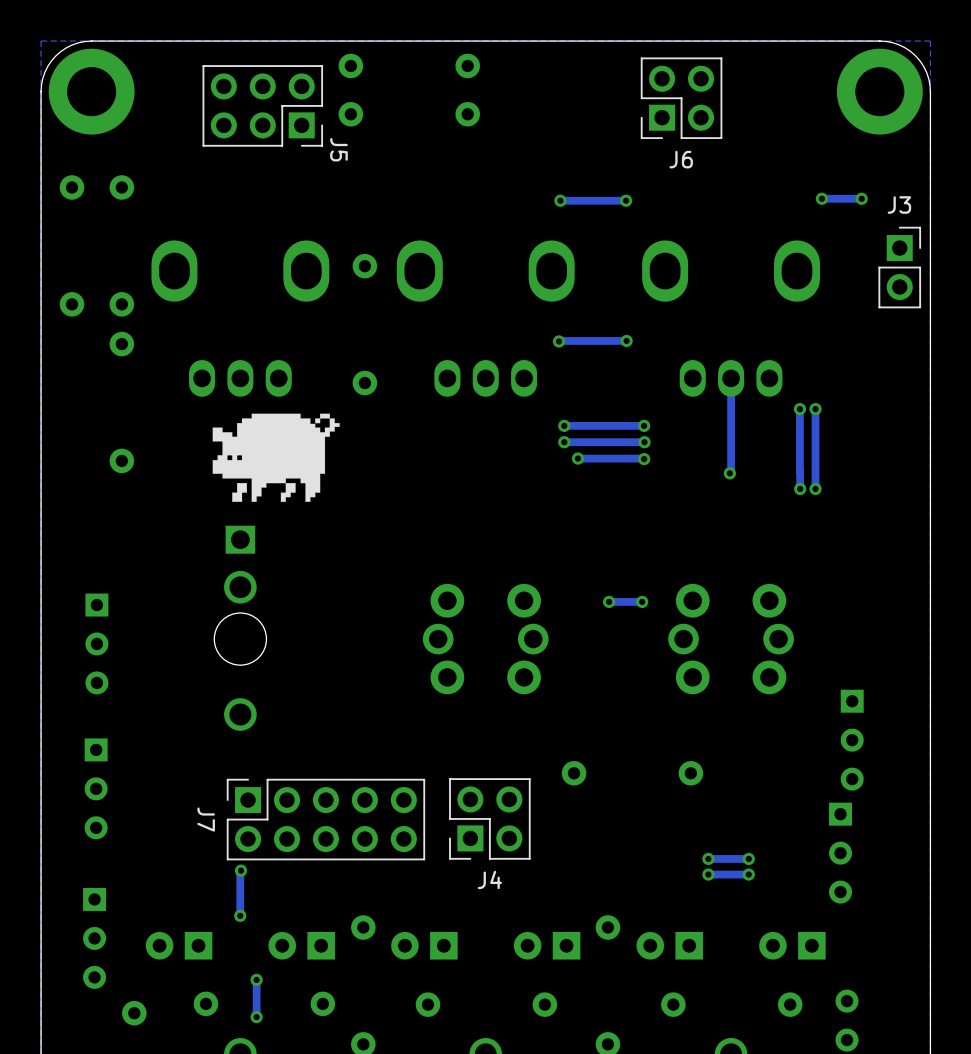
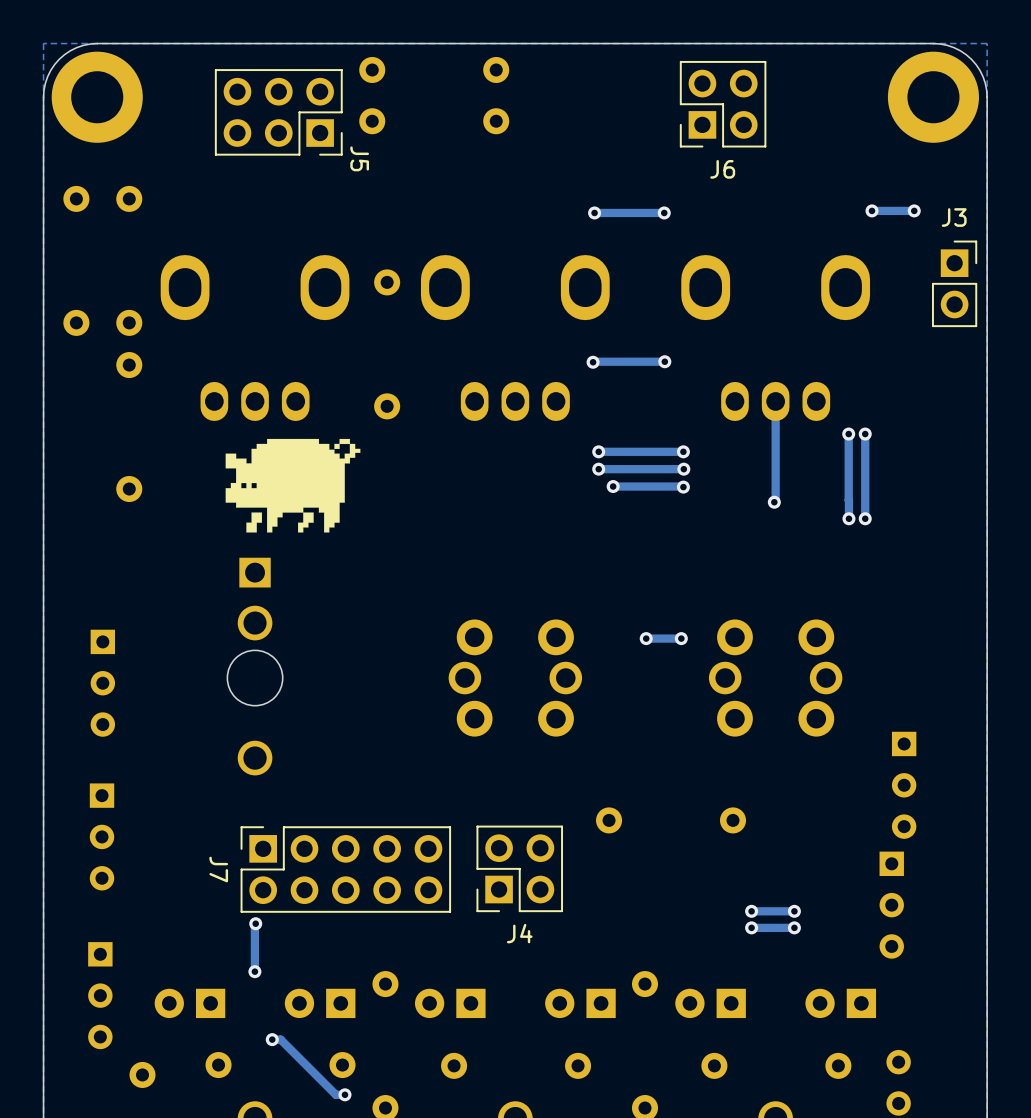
track: (256, 979) (256, 1017) -> (272, 1039) (280, 1039) (335, 1094) (344, 1094)
via position: (256, 1017) -> (344, 1094)

